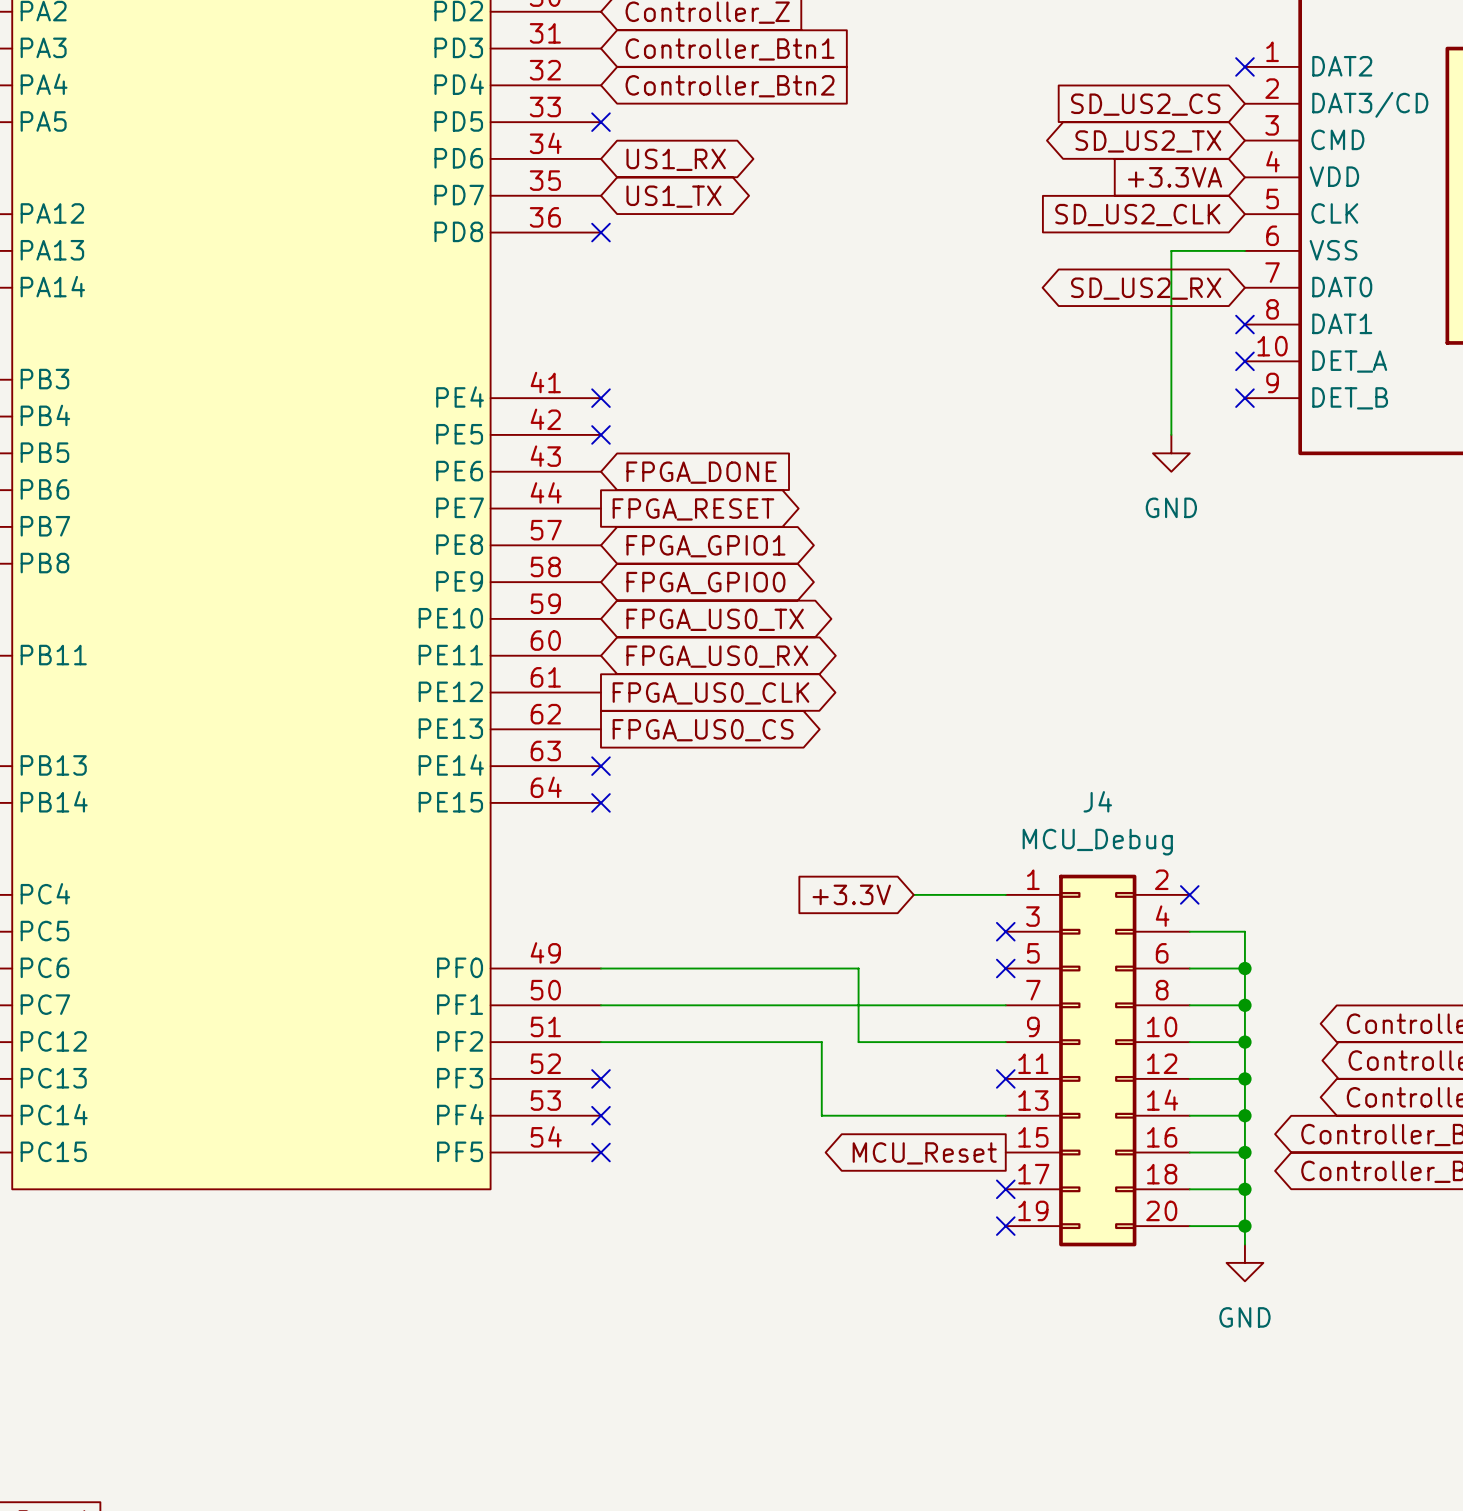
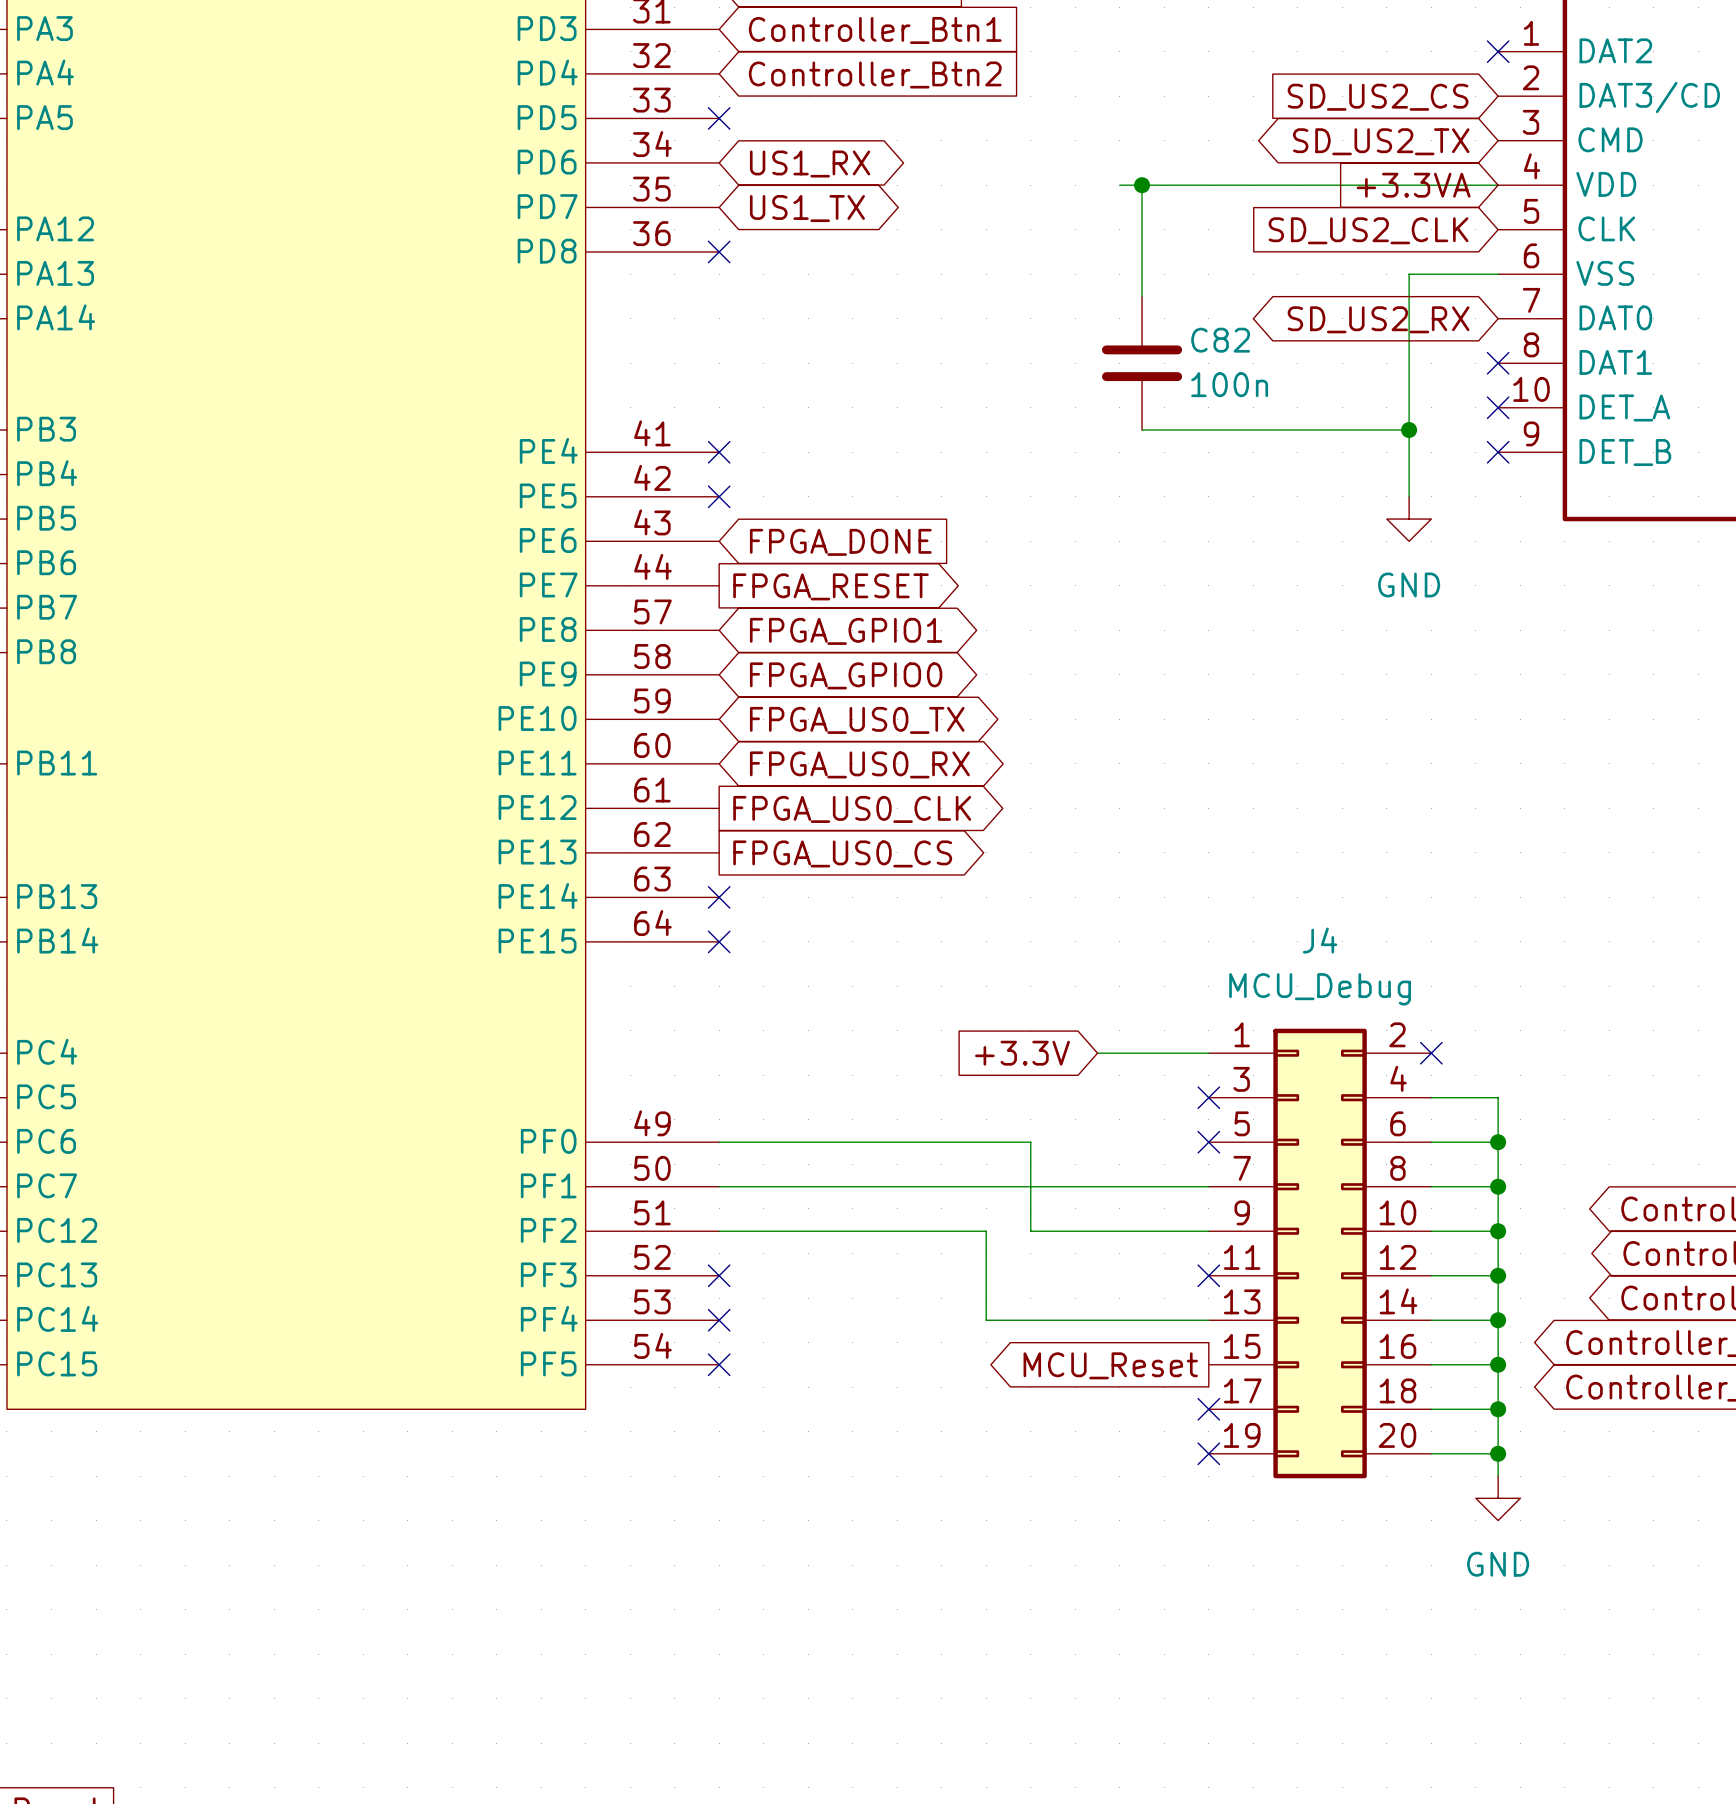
wire: none -> (1119, 185) (1498, 185)
wire: none -> (1142, 185) (1142, 296)
junction: none -> (1142, 185)
C82: none -> 100n (1142, 363)
wire: none -> (1142, 430) (1409, 430)
junction: none -> (1409, 430)

